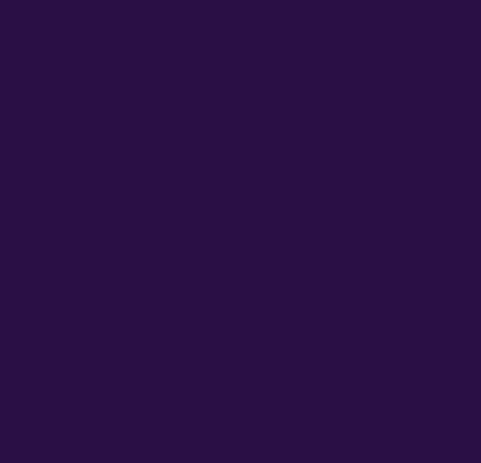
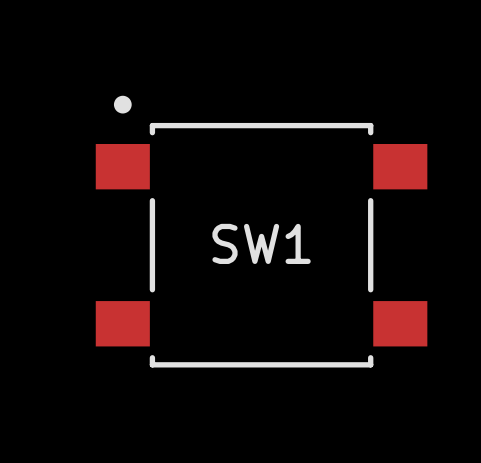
SW1: none -> (261, 231)

